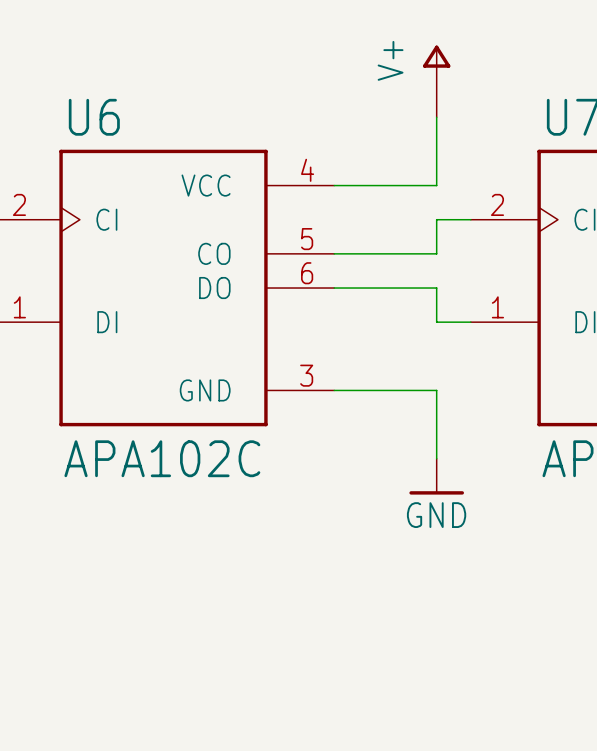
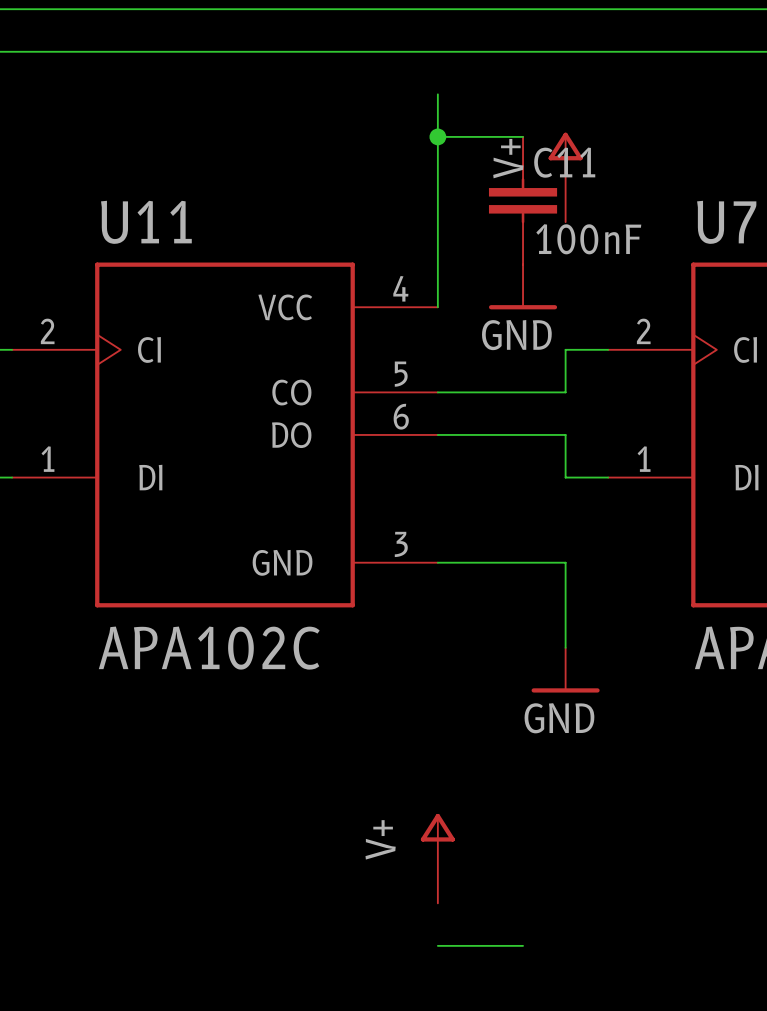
wire: none -> (437, 136) (523, 136)
junction: none -> (437, 136)
C11: none -> 100nF (523, 200)
U6 name: U6 (94, 117) -> U11 (146, 222)
wire: (436, 117) (436, 185) (334, 185) -> (437, 94) (437, 307)
power symbol: none -> GND (523, 287)
power symbol: none -> V+ (437, 858)
wire: none -> (437, 945) (523, 945)

